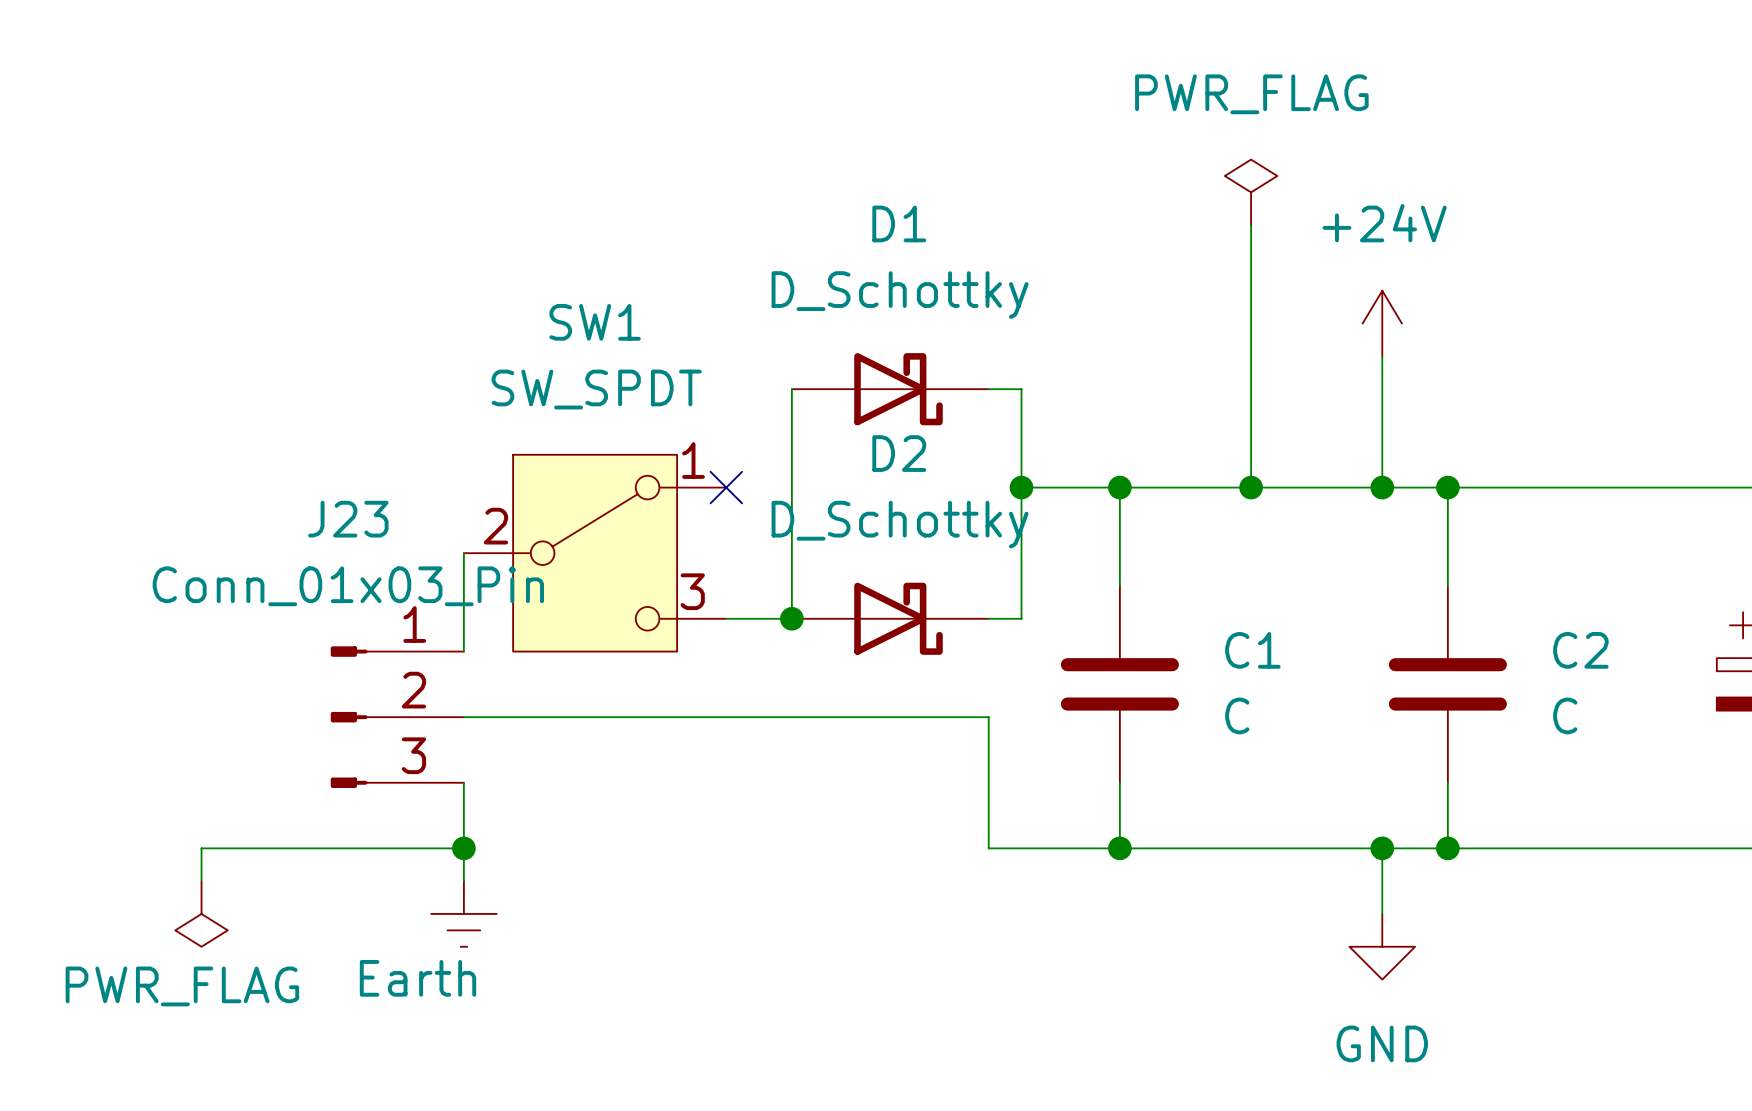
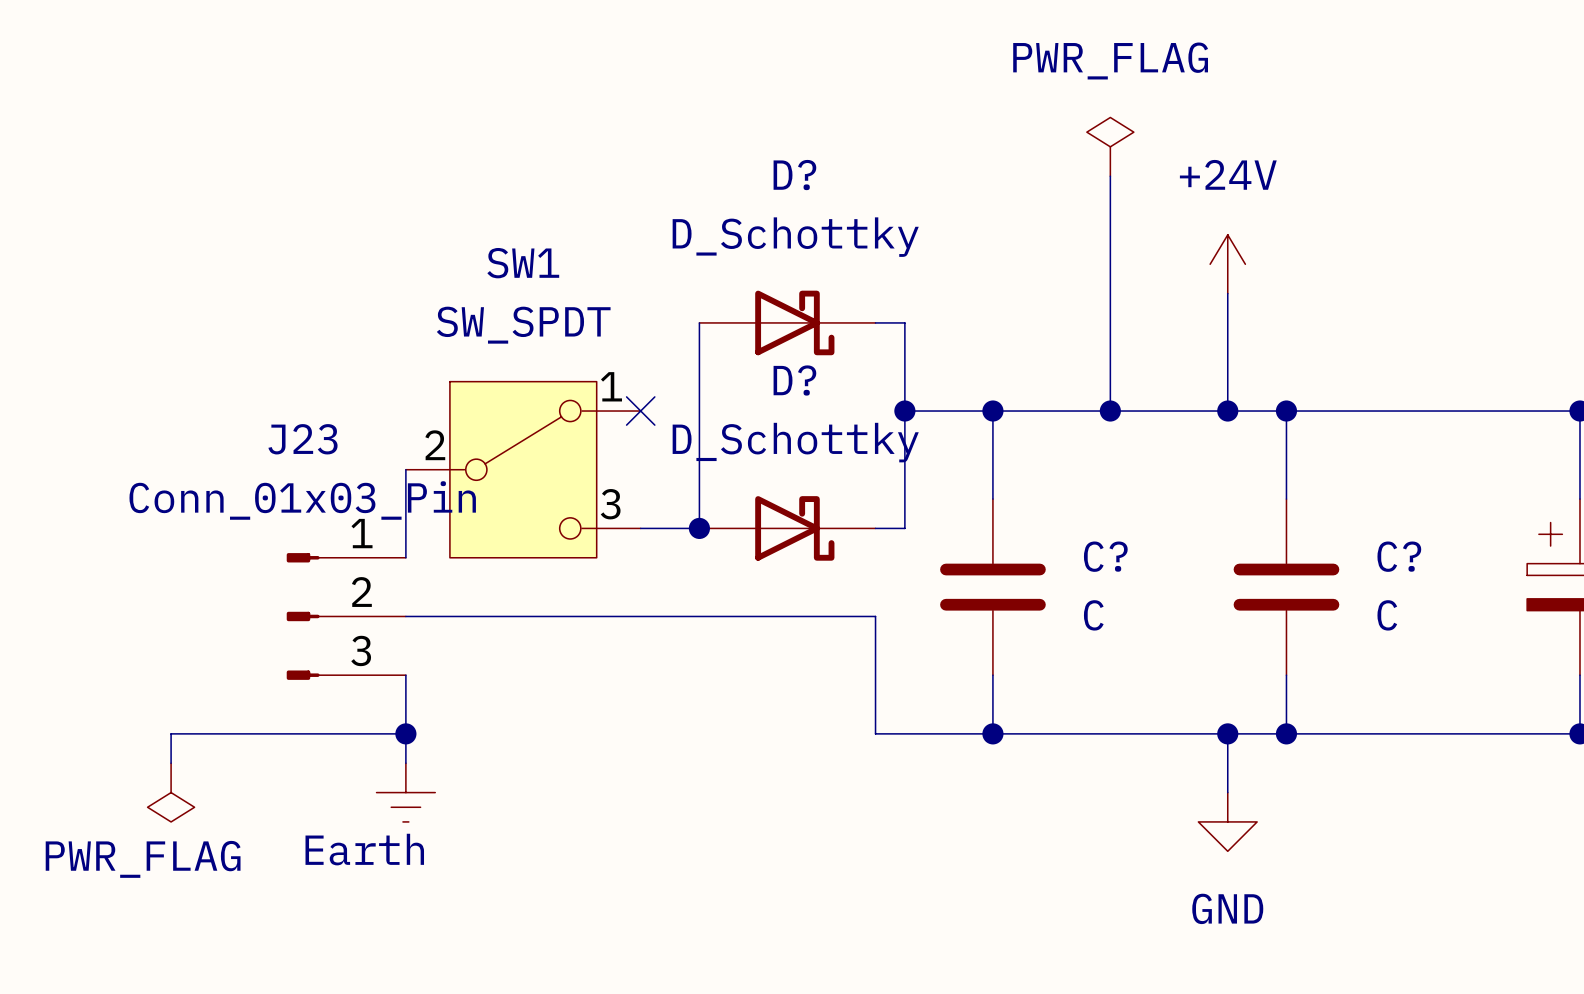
D1 name: D1 (899, 223) -> D? (794, 175)
D2 name: D2 (899, 453) -> D? (794, 380)
C1 name: C1 (1252, 650) -> C? (1105, 556)
C2 name: C2 (1580, 650) -> C? (1399, 556)

